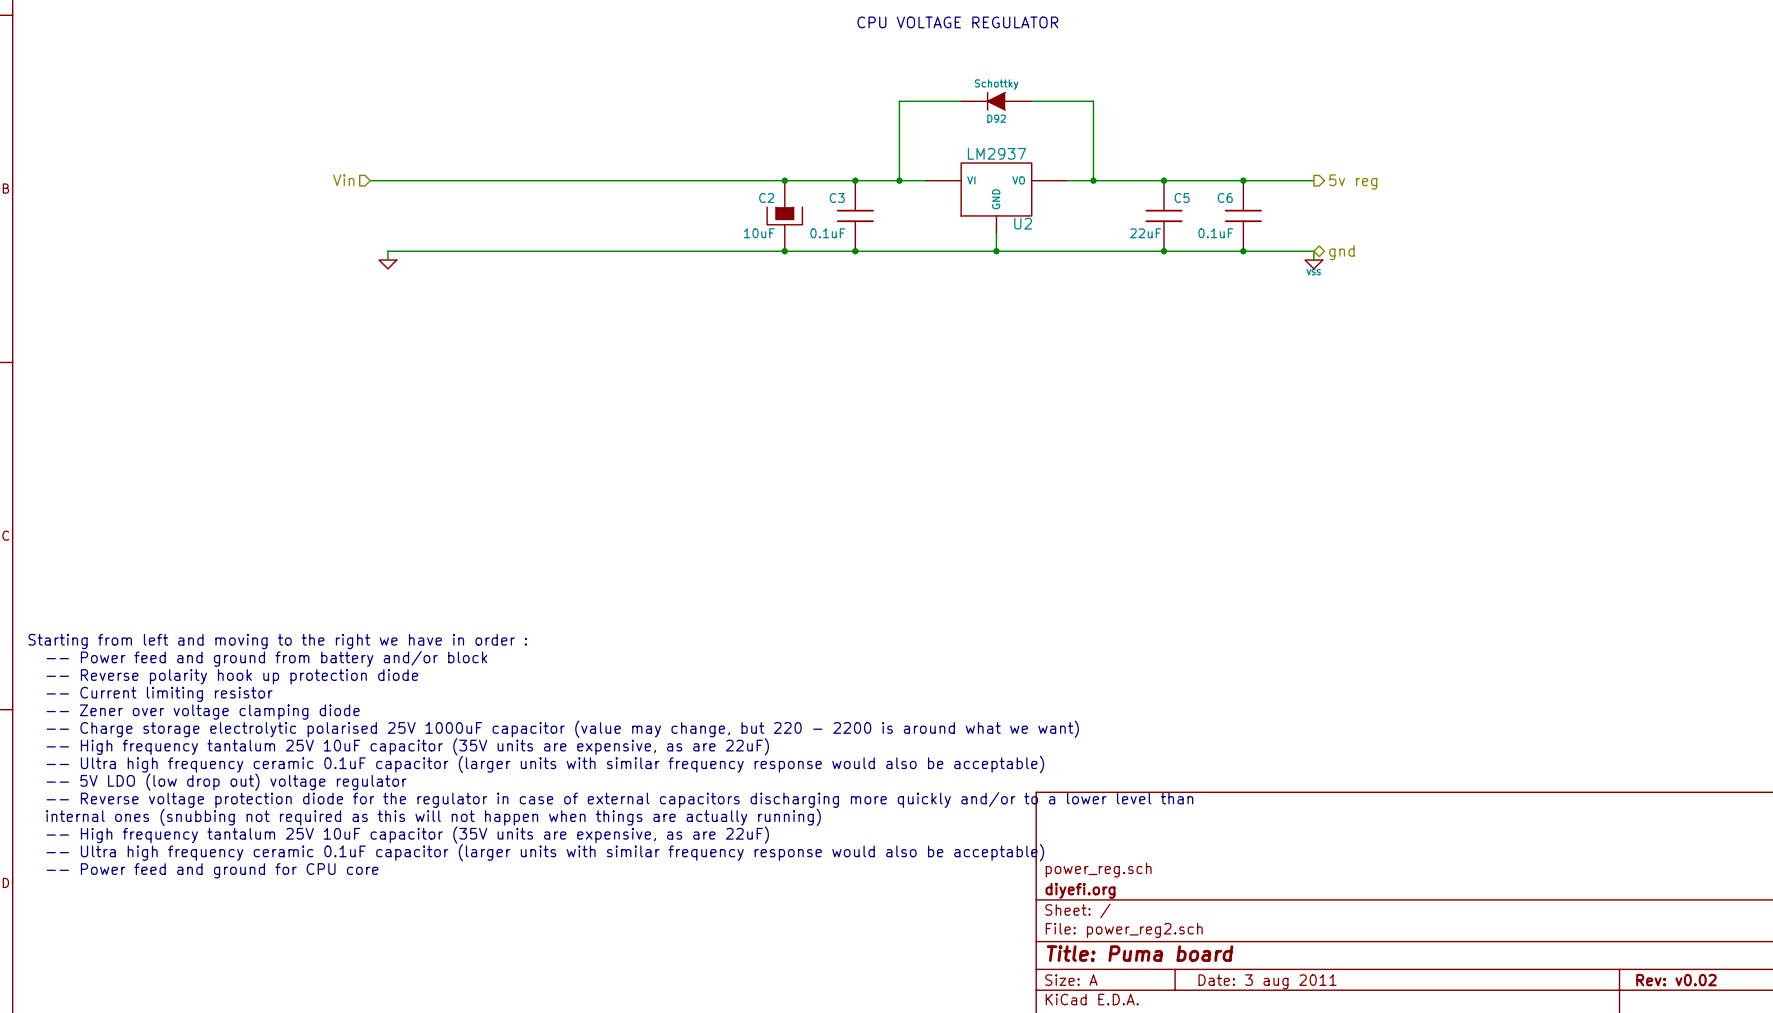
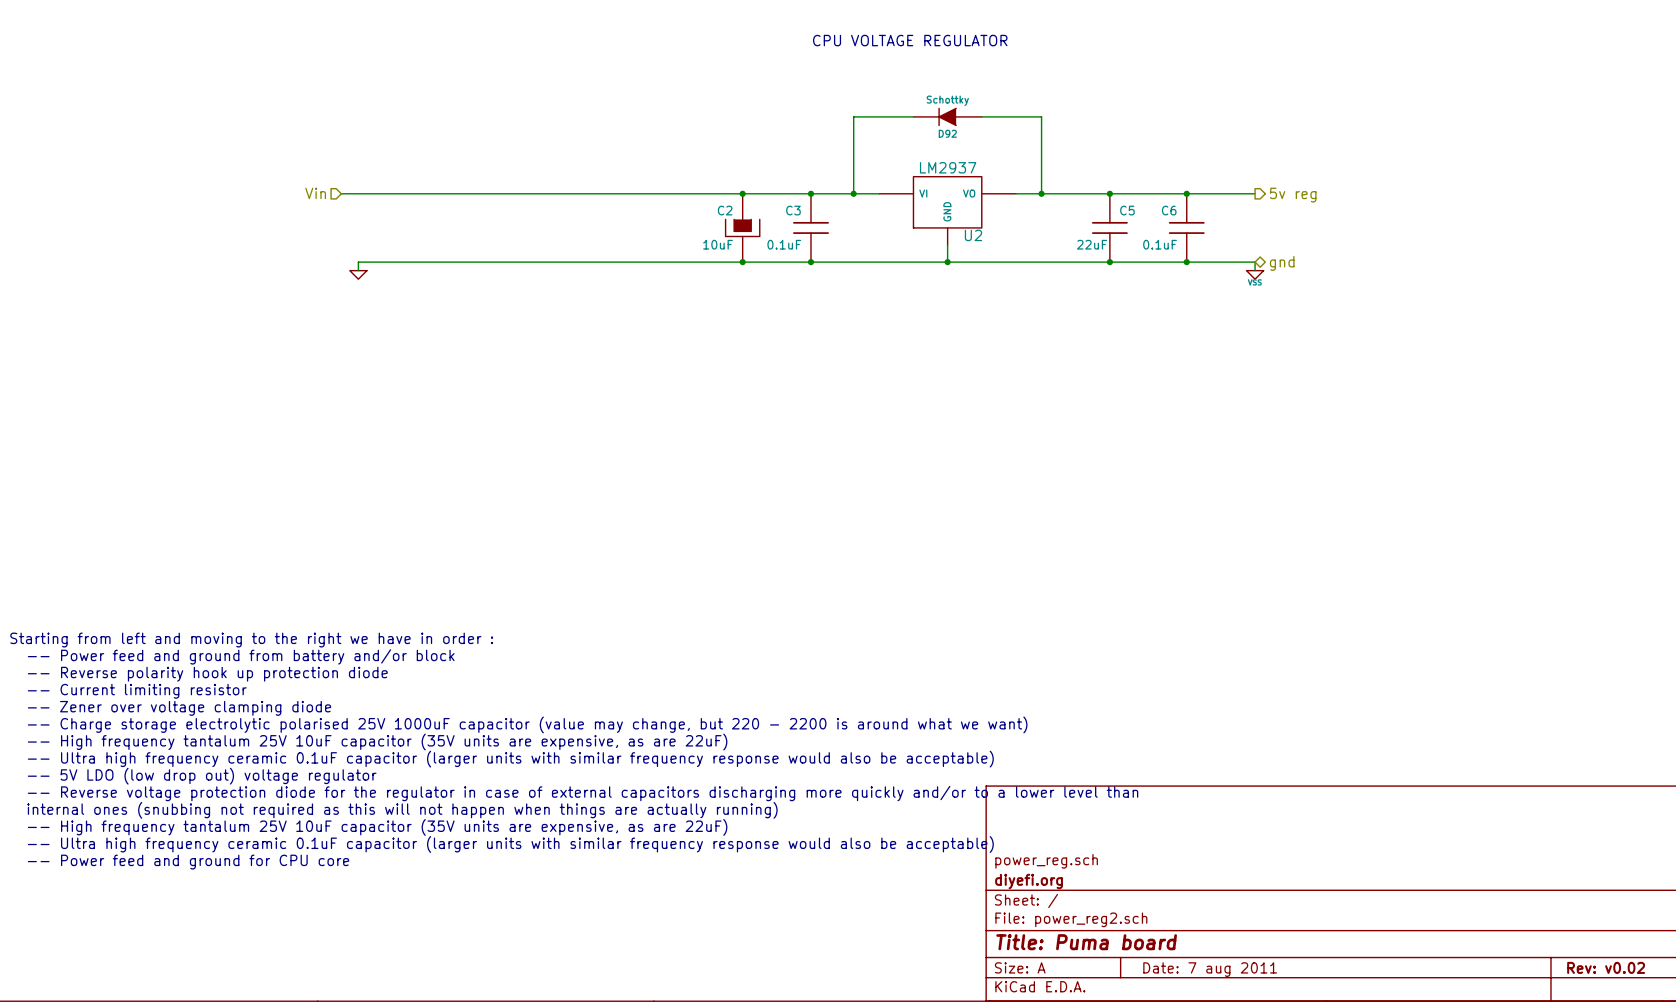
title block: Date: 3 aug 2011 (1267, 981) -> Date: 7 aug 2011 (1210, 969)

